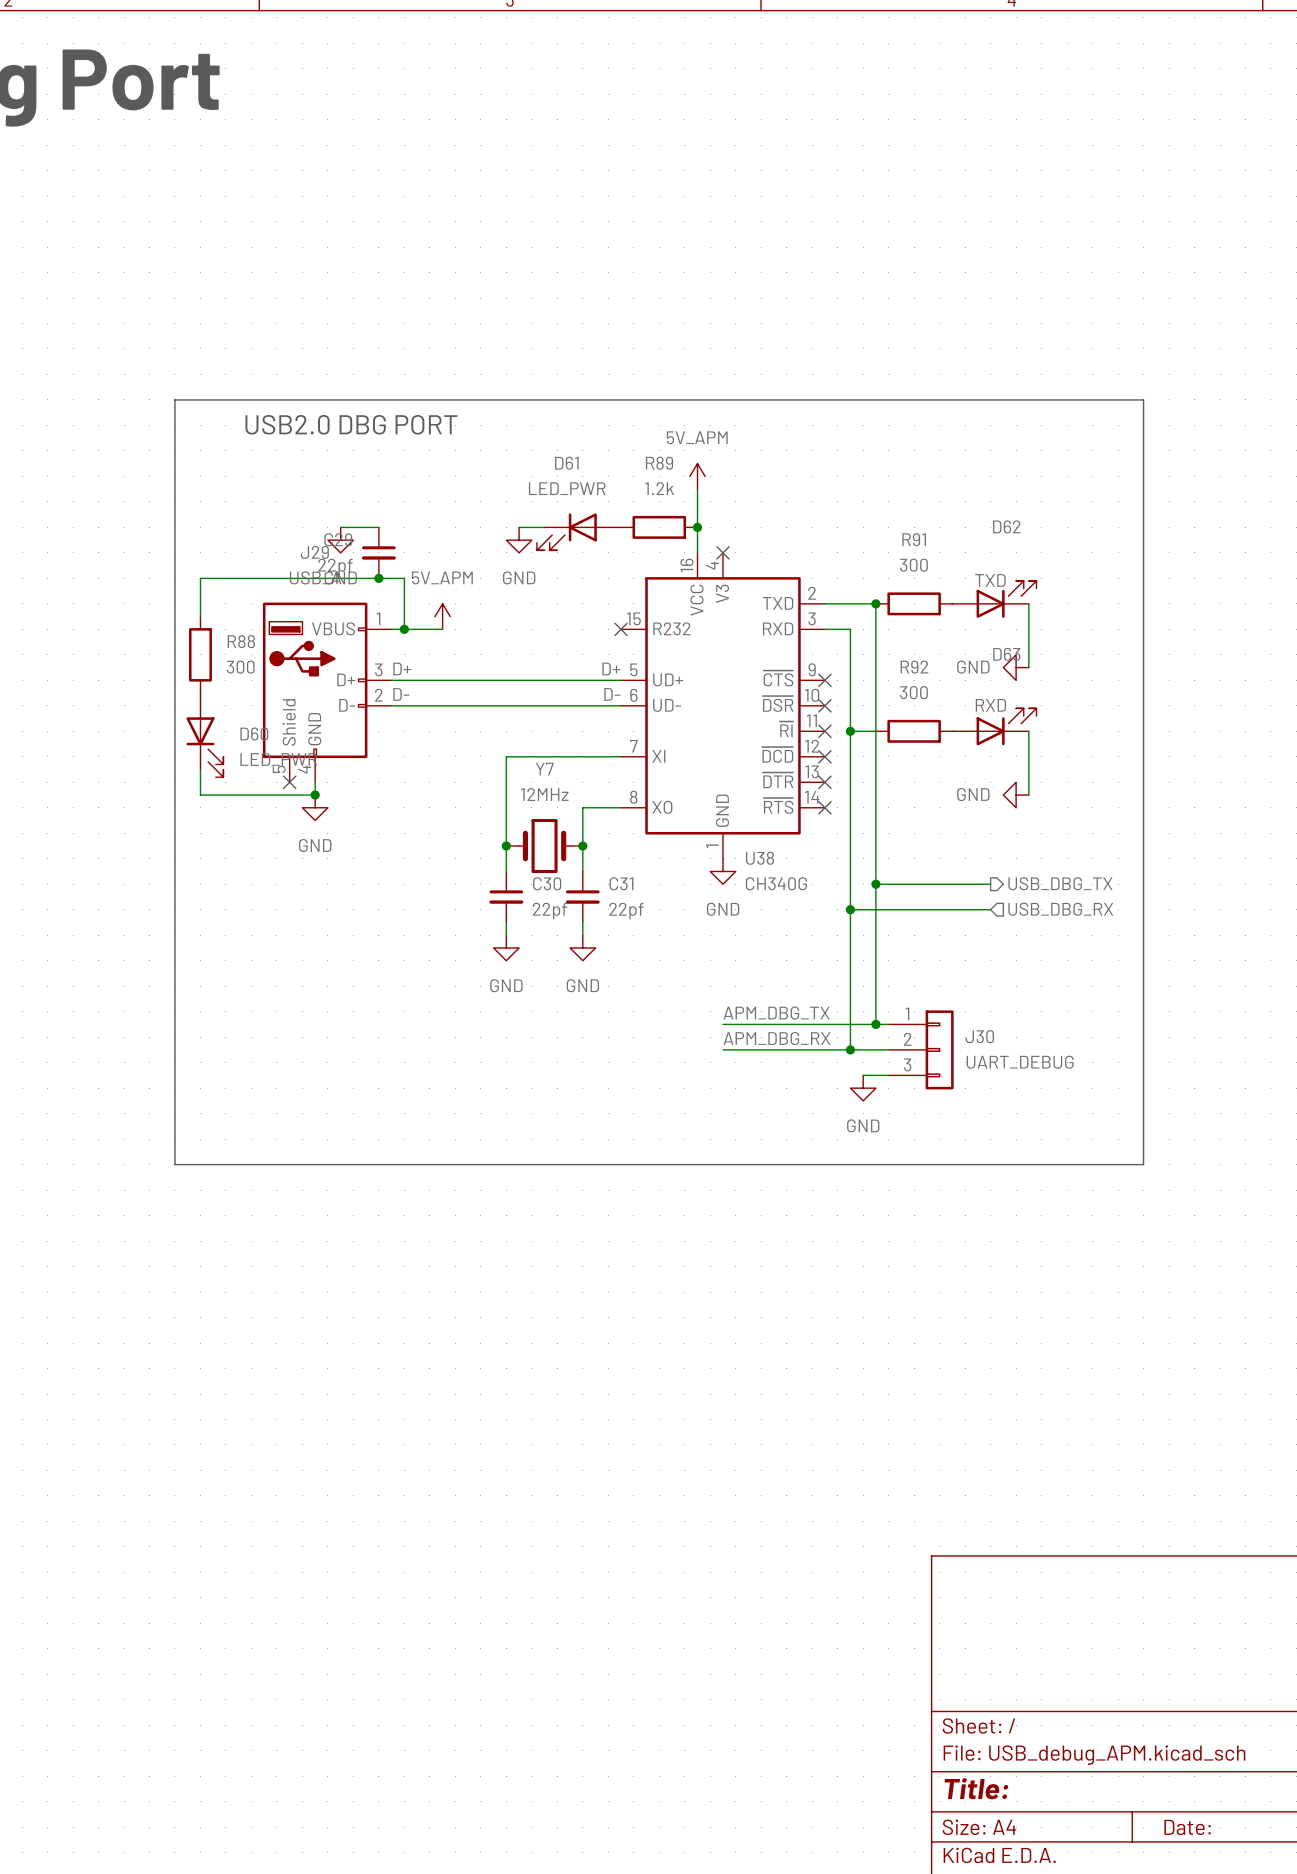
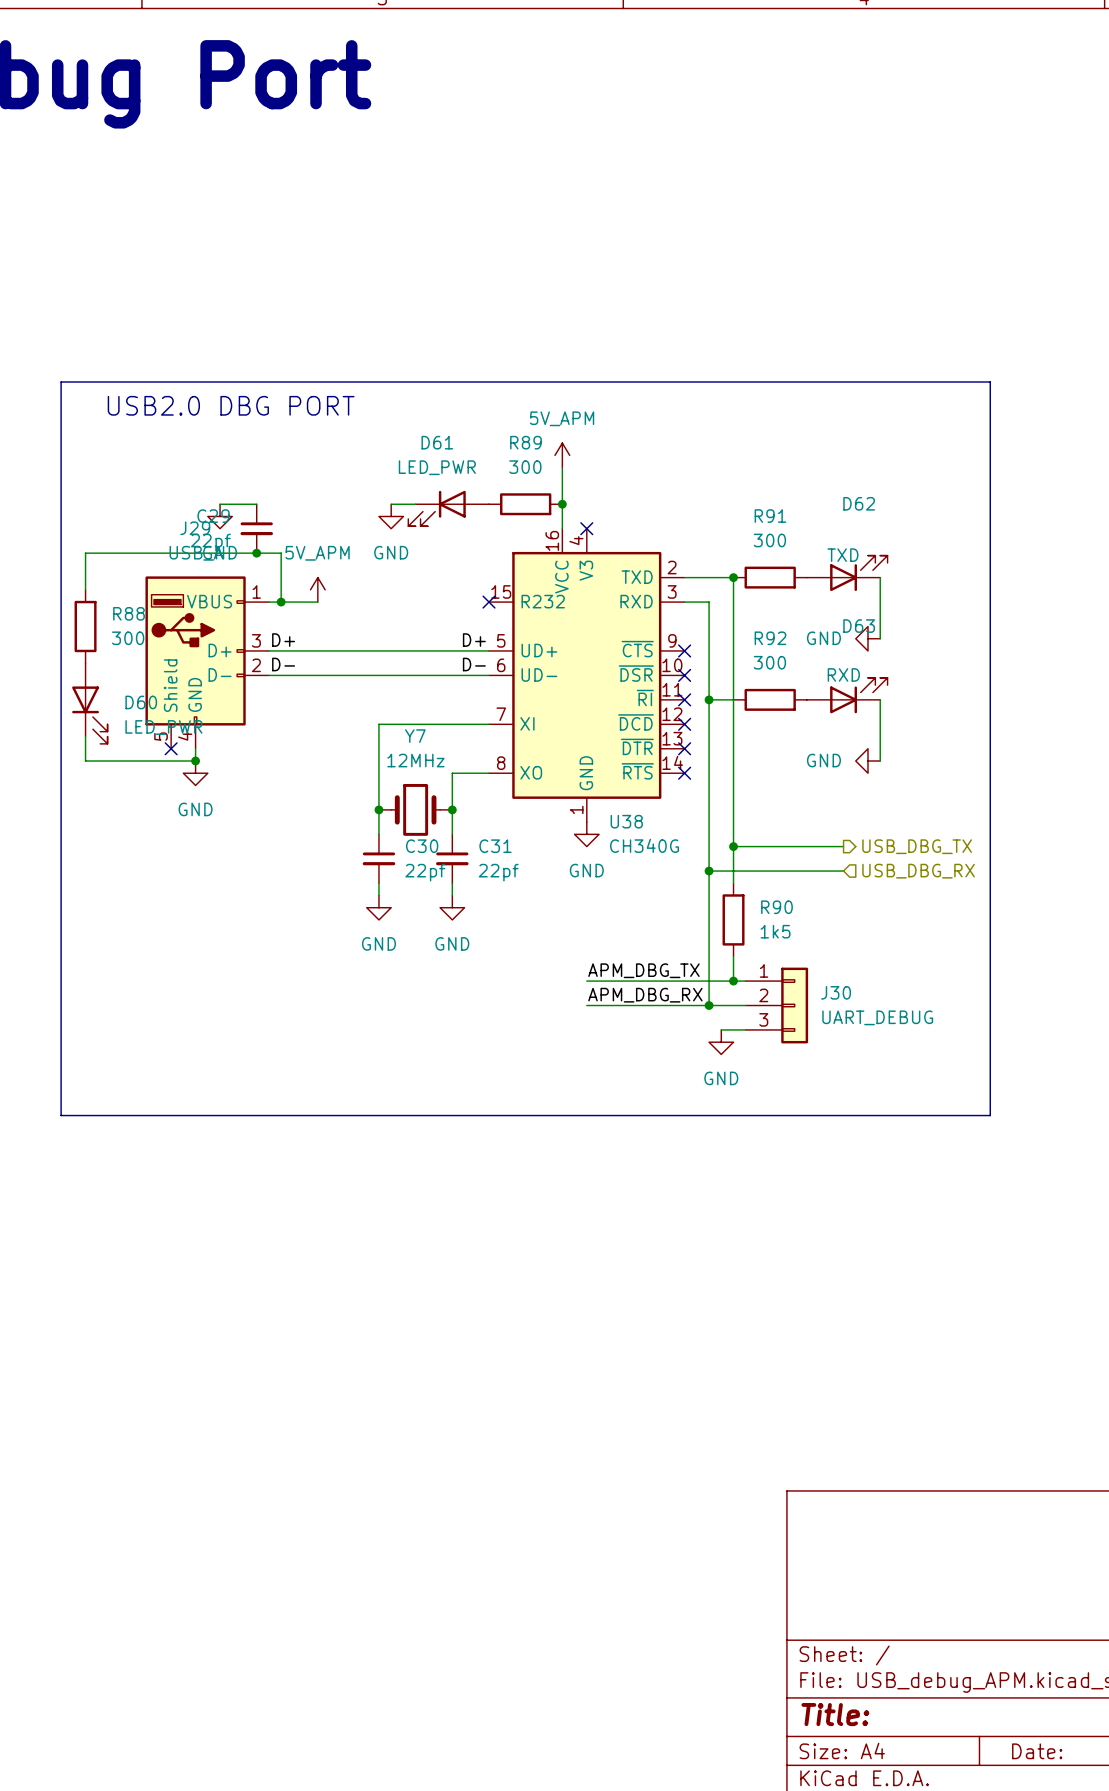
R89 value: 1.2k (659, 488) -> 300 (525, 467)
wire: (875, 922) (875, 998) -> none
R90: none -> 1k5 (733, 919)

